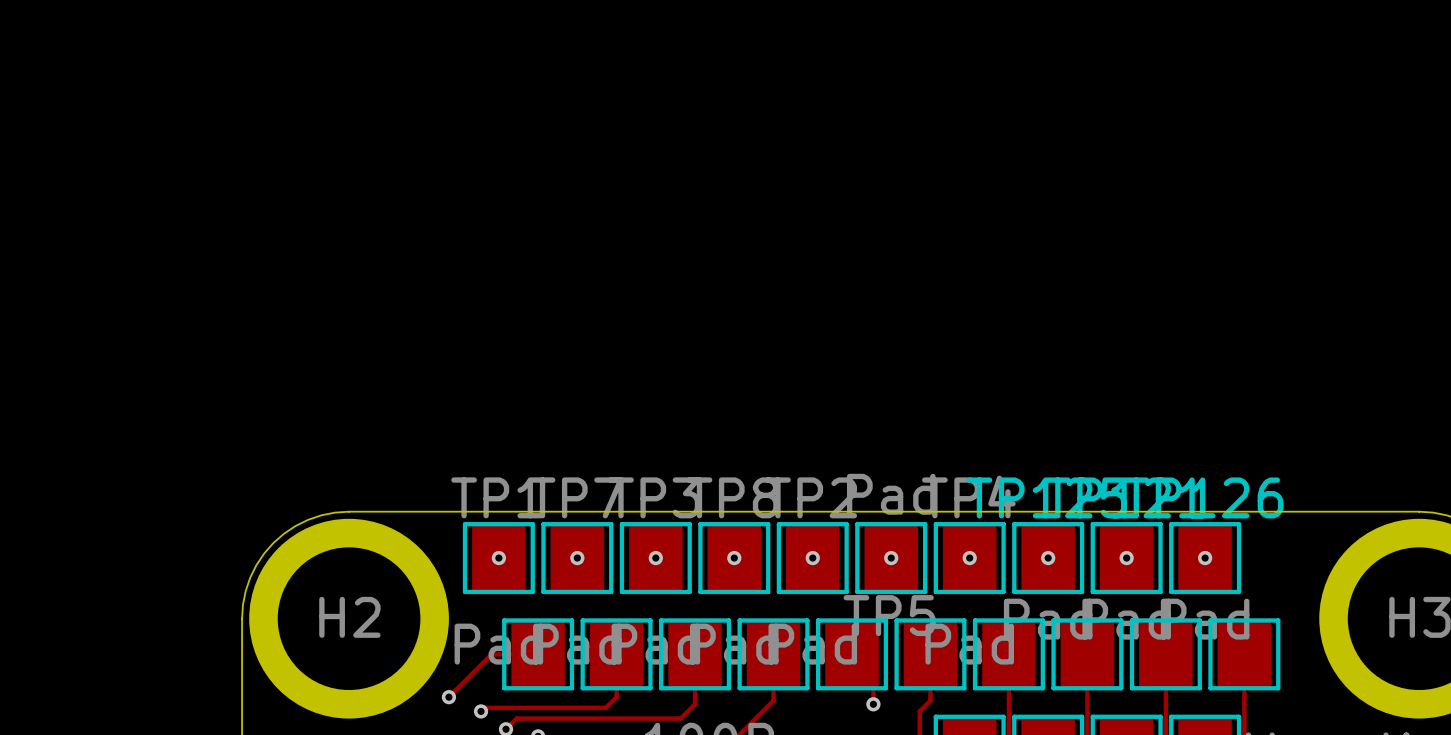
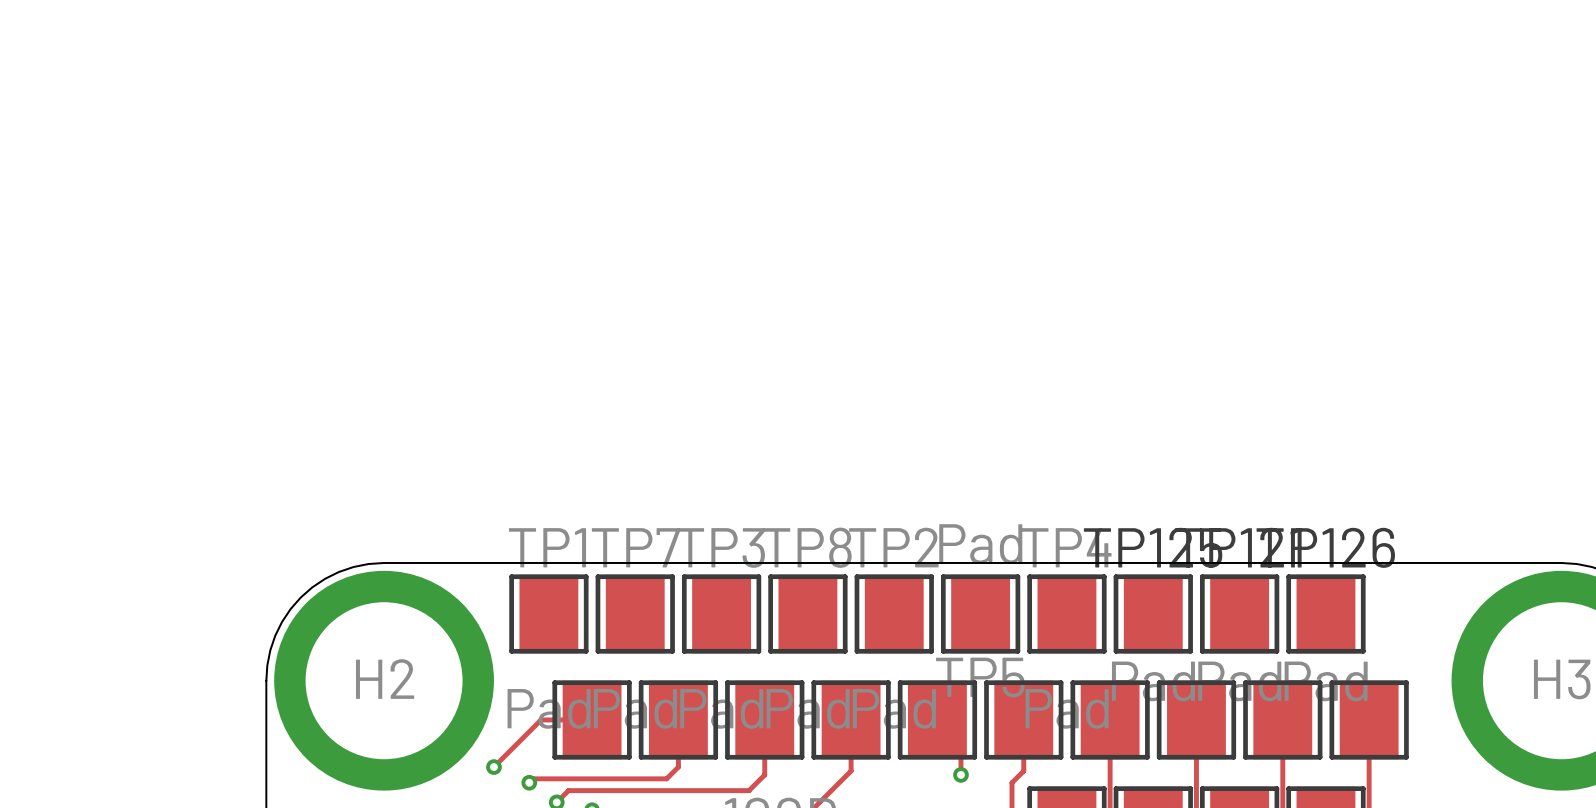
via: (498, 558) -> none
via: (577, 558) -> none
via: (655, 558) -> none
via: (734, 558) -> none
via: (812, 558) -> none
via: (891, 558) -> none
via: (969, 558) -> none
via: (1048, 558) -> none
via: (1126, 558) -> none
via: (1205, 558) -> none

